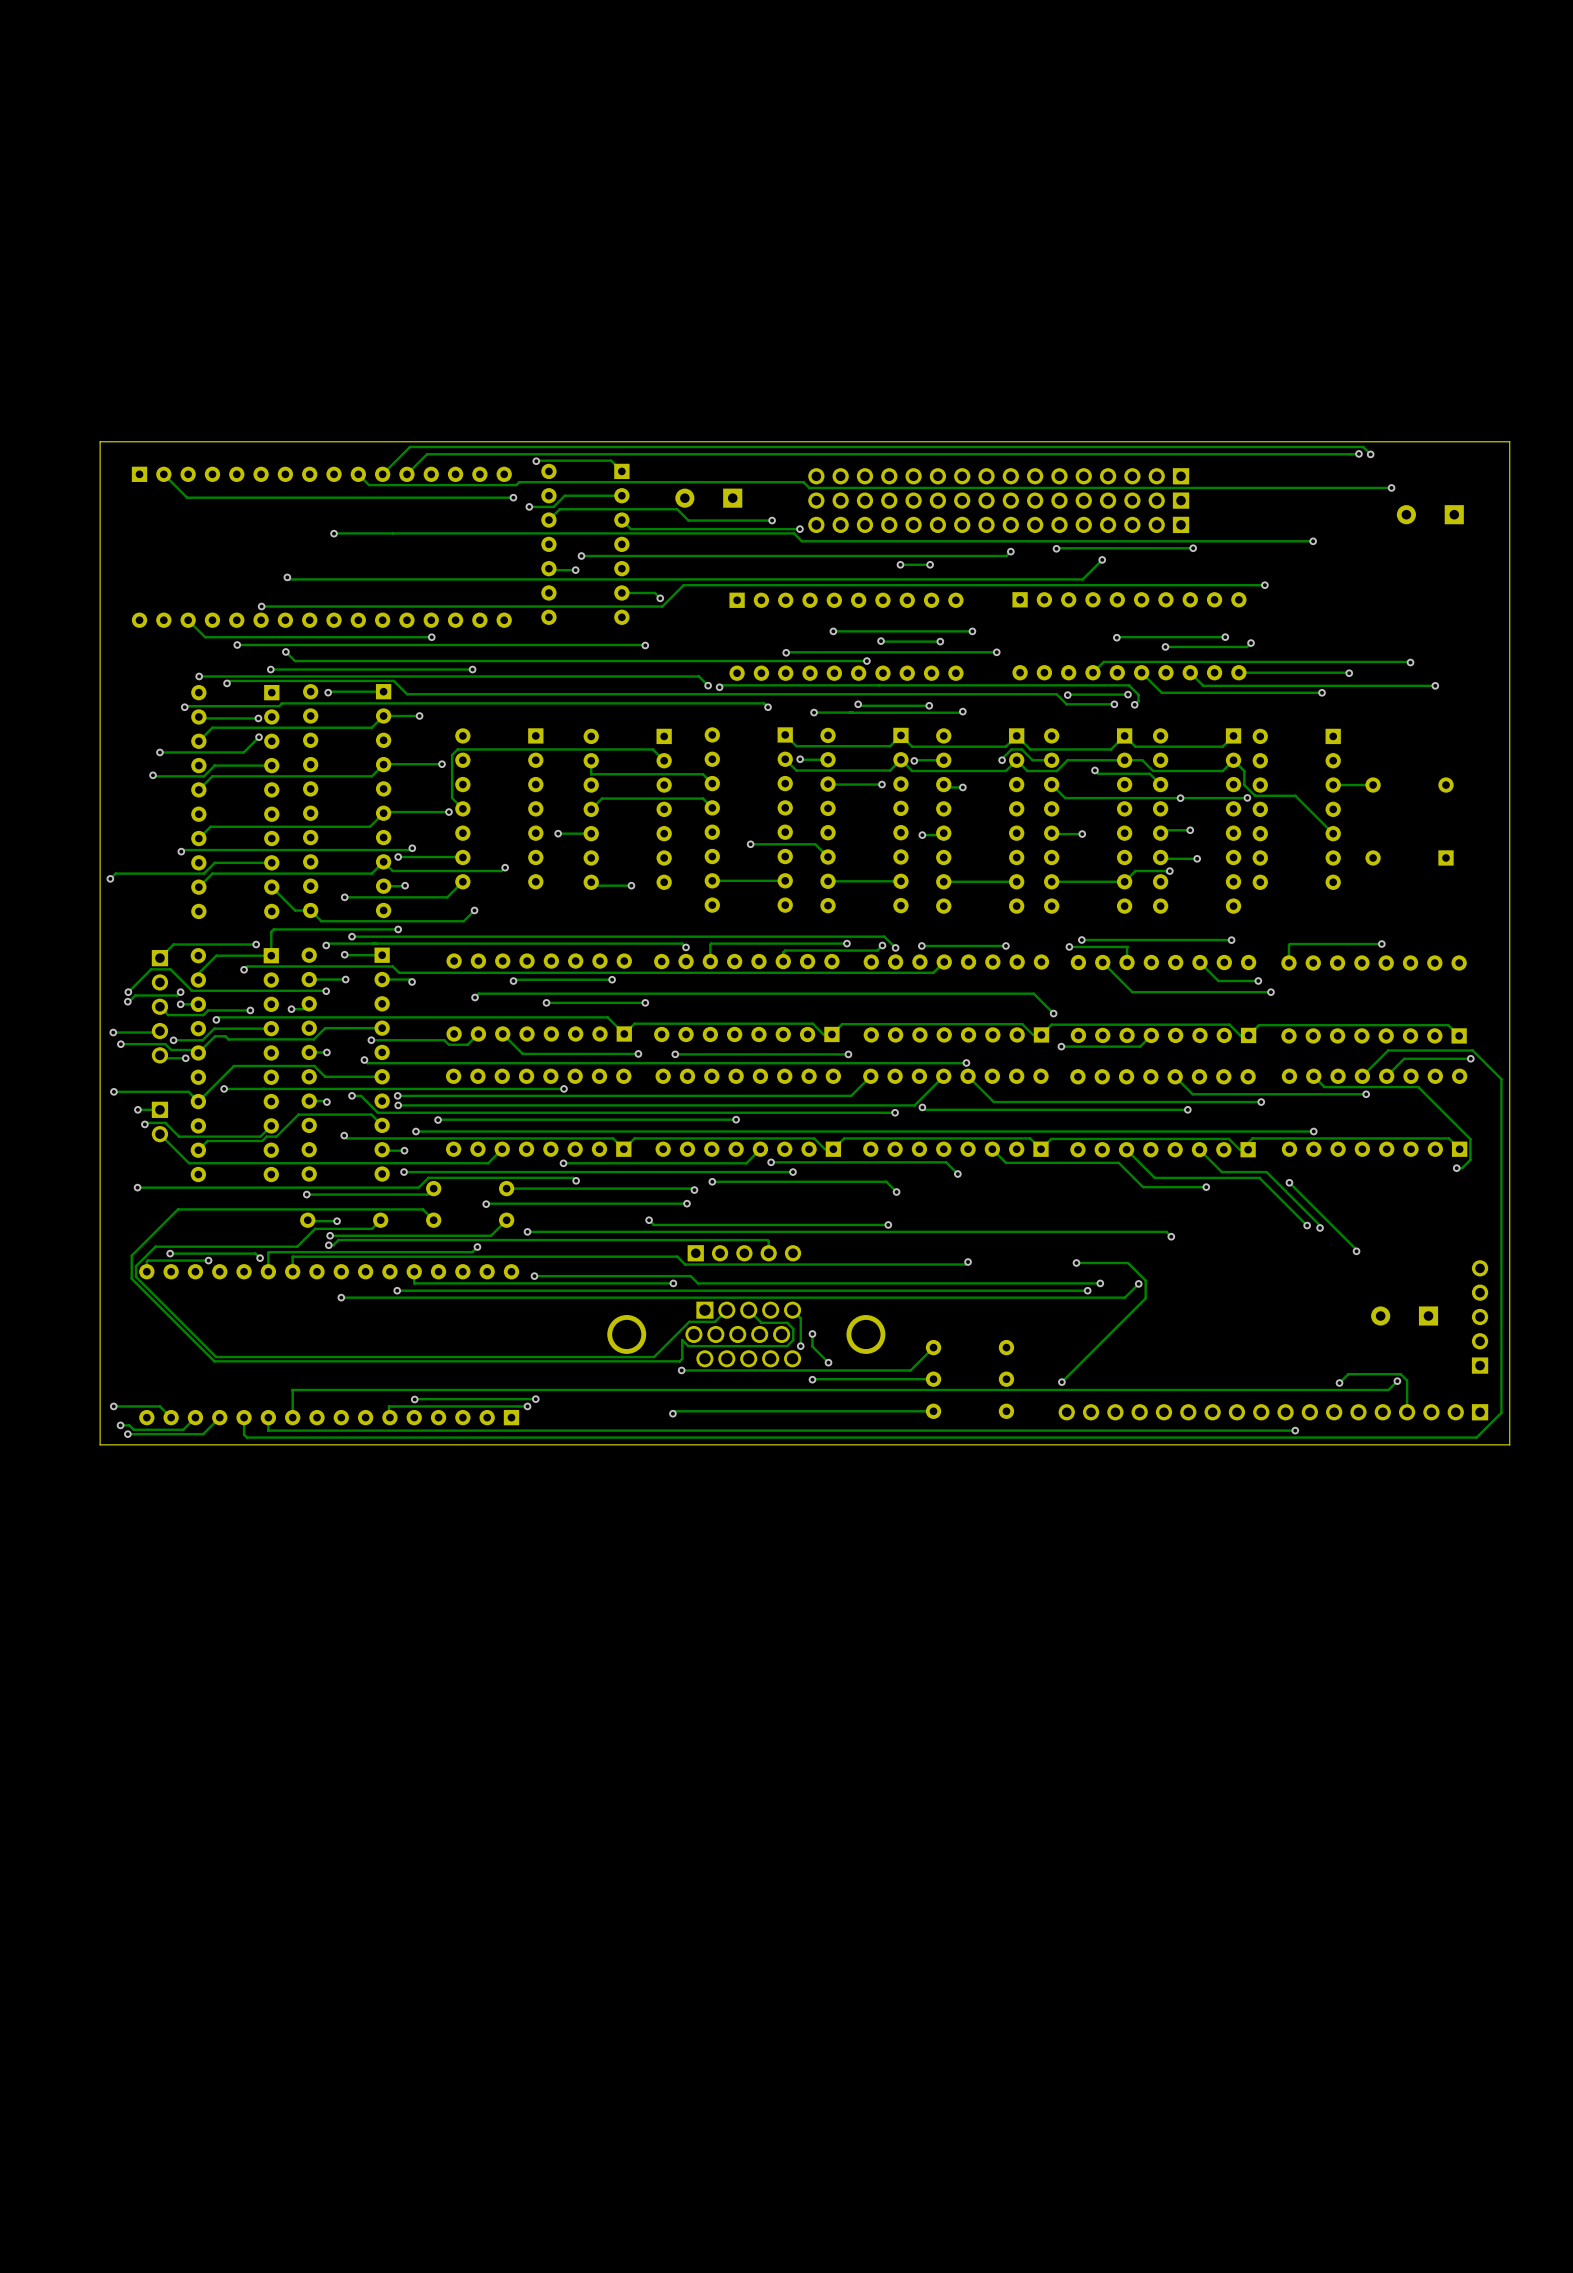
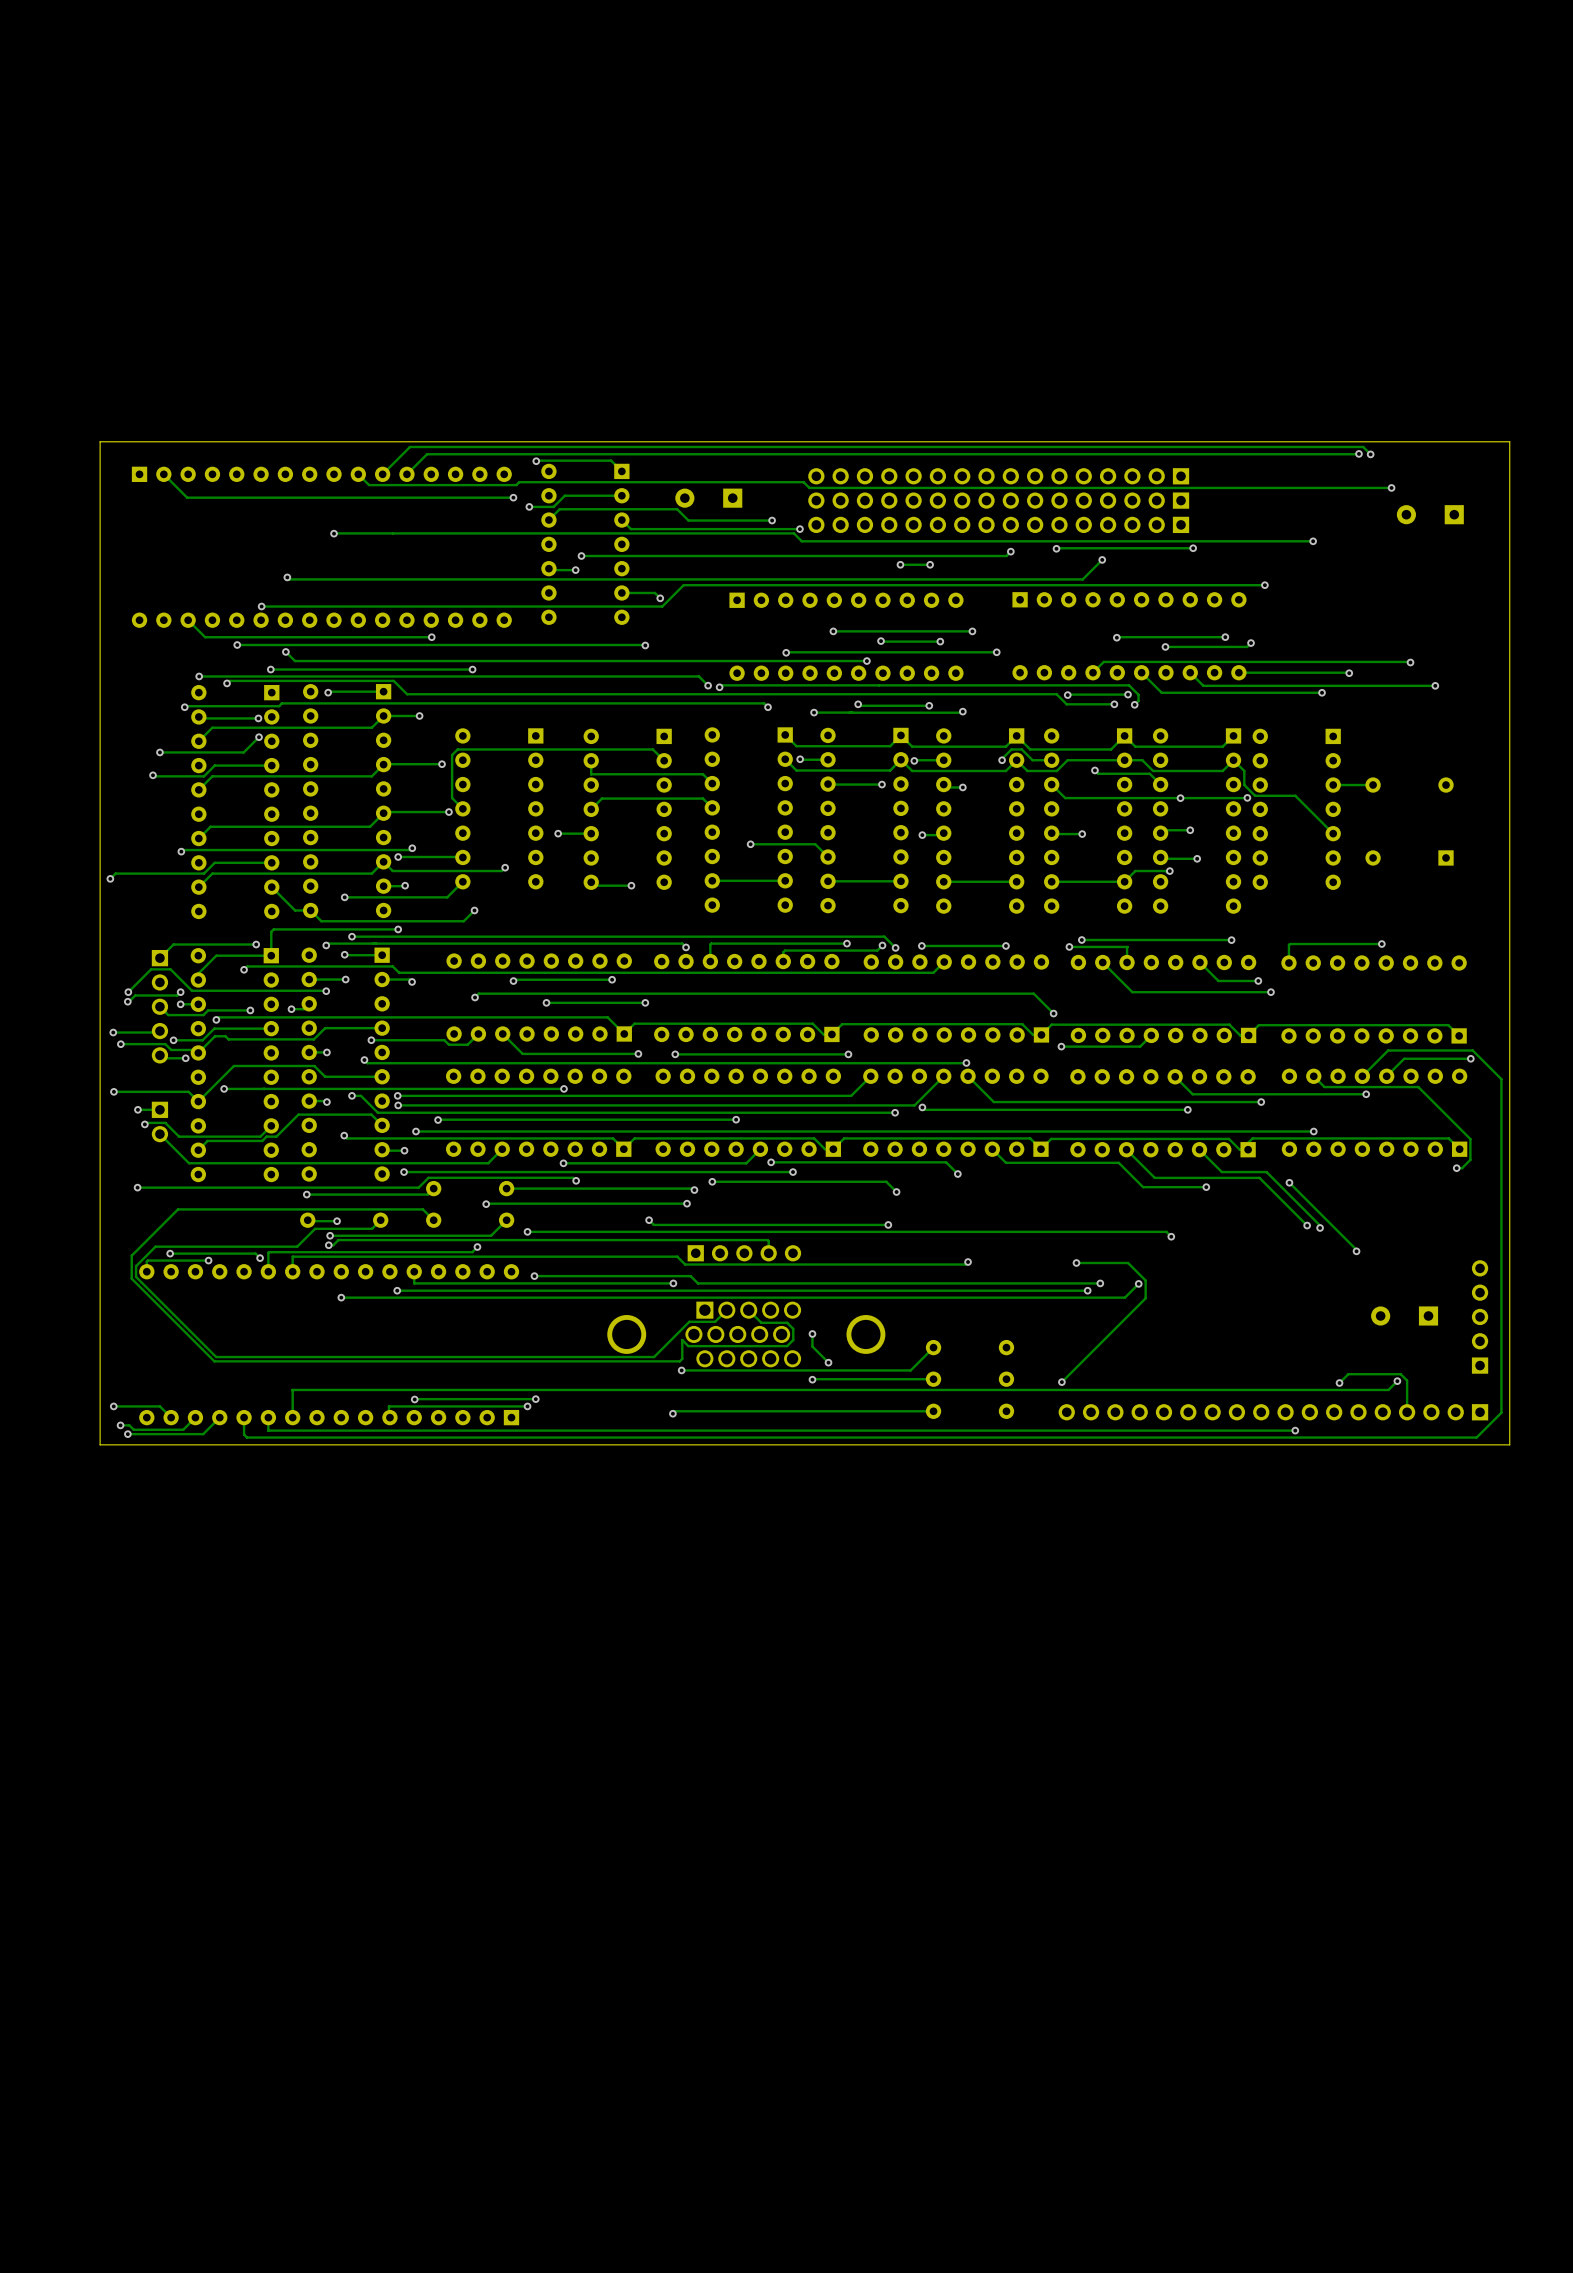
track: (792, 1310) (800, 1318) (800, 1346) -> none
via: (800, 1346) -> none

